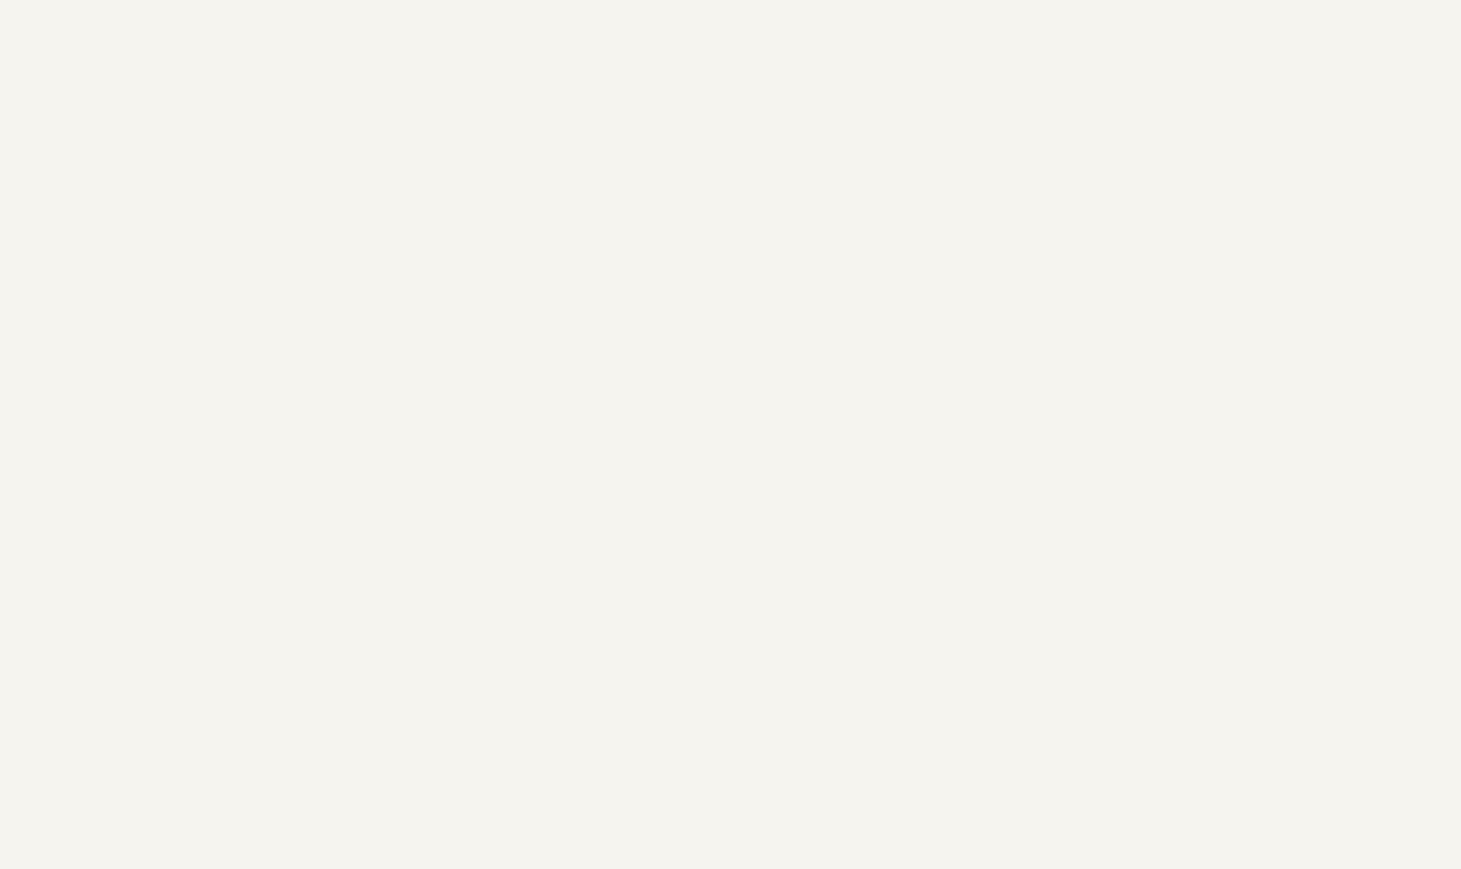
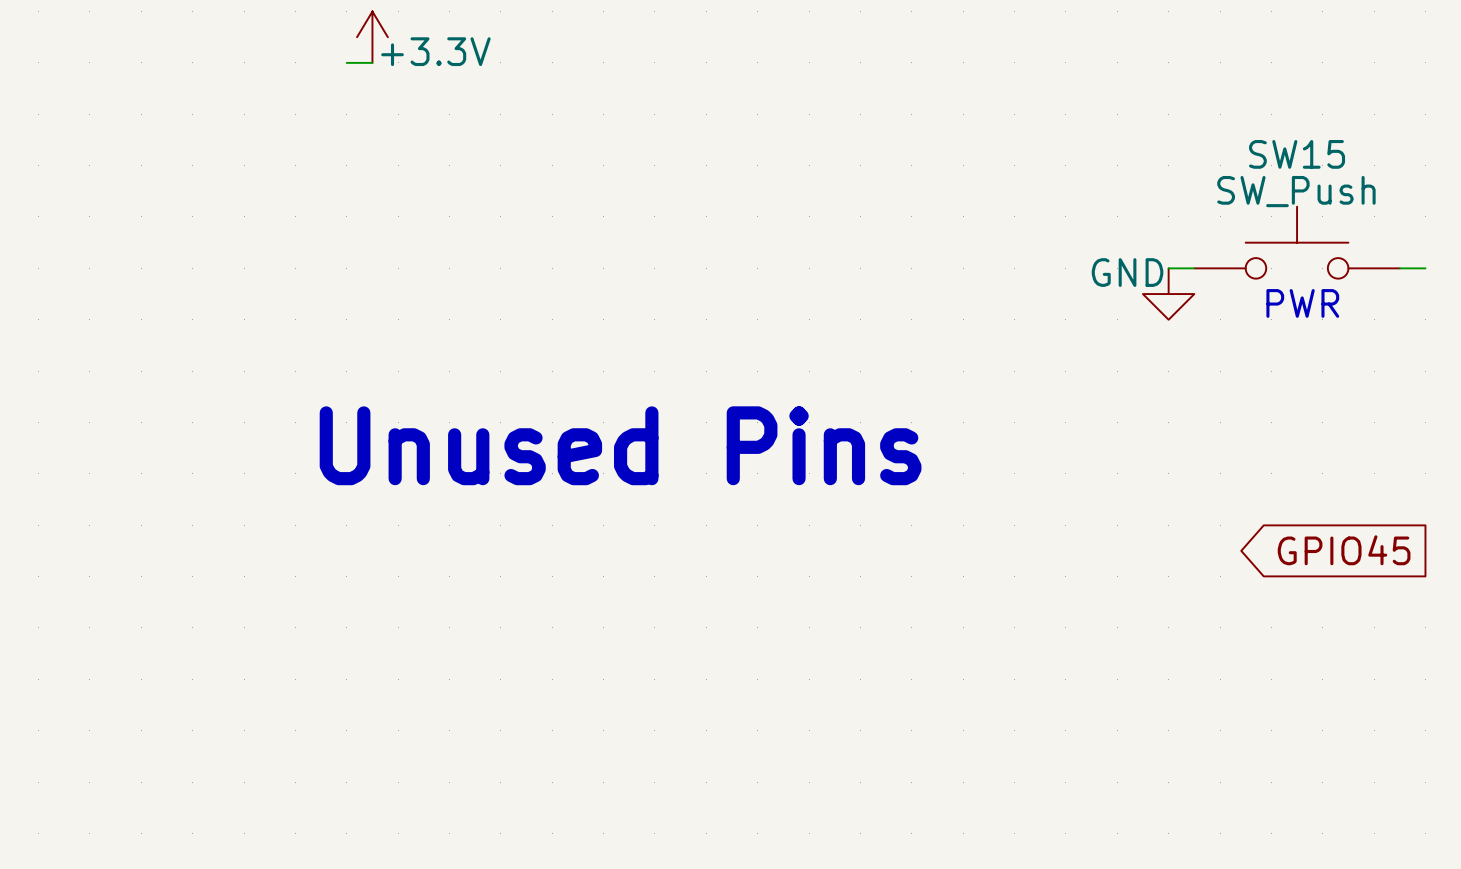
power symbol: none -> +3.3V (372, 37)
wire: none -> (346, 62) (372, 62)
SW15: none -> SW_Push (1297, 242)
wire: none -> (1168, 268) (1194, 268)
wire: none -> (1399, 268) (1425, 268)
power symbol: none -> GND (1168, 294)
text: none -> PWR (1302, 303)
text: none -> Unused Pins (620, 445)
global label: none -> GPIO45 (1344, 550)

